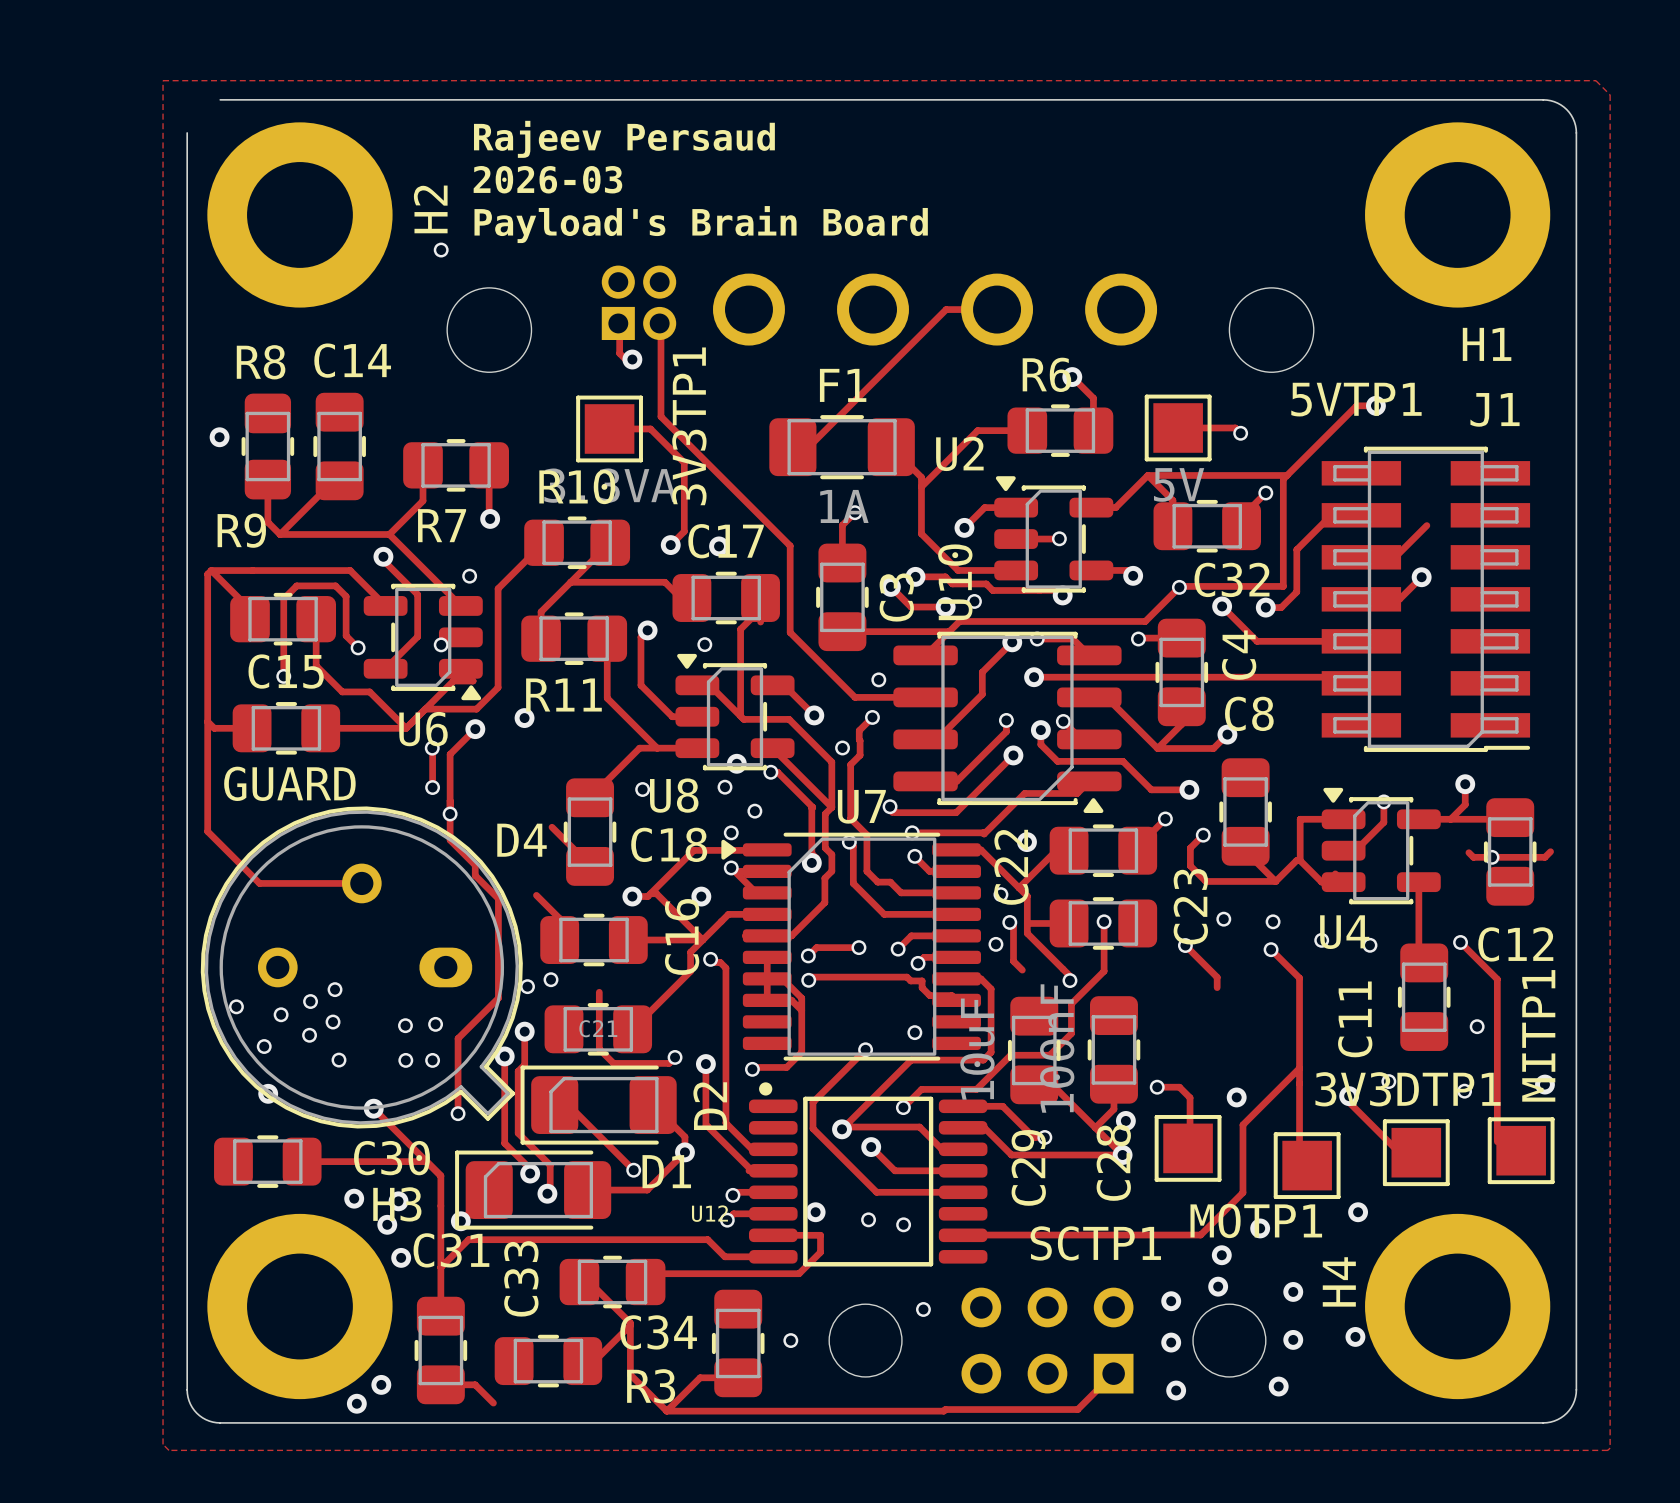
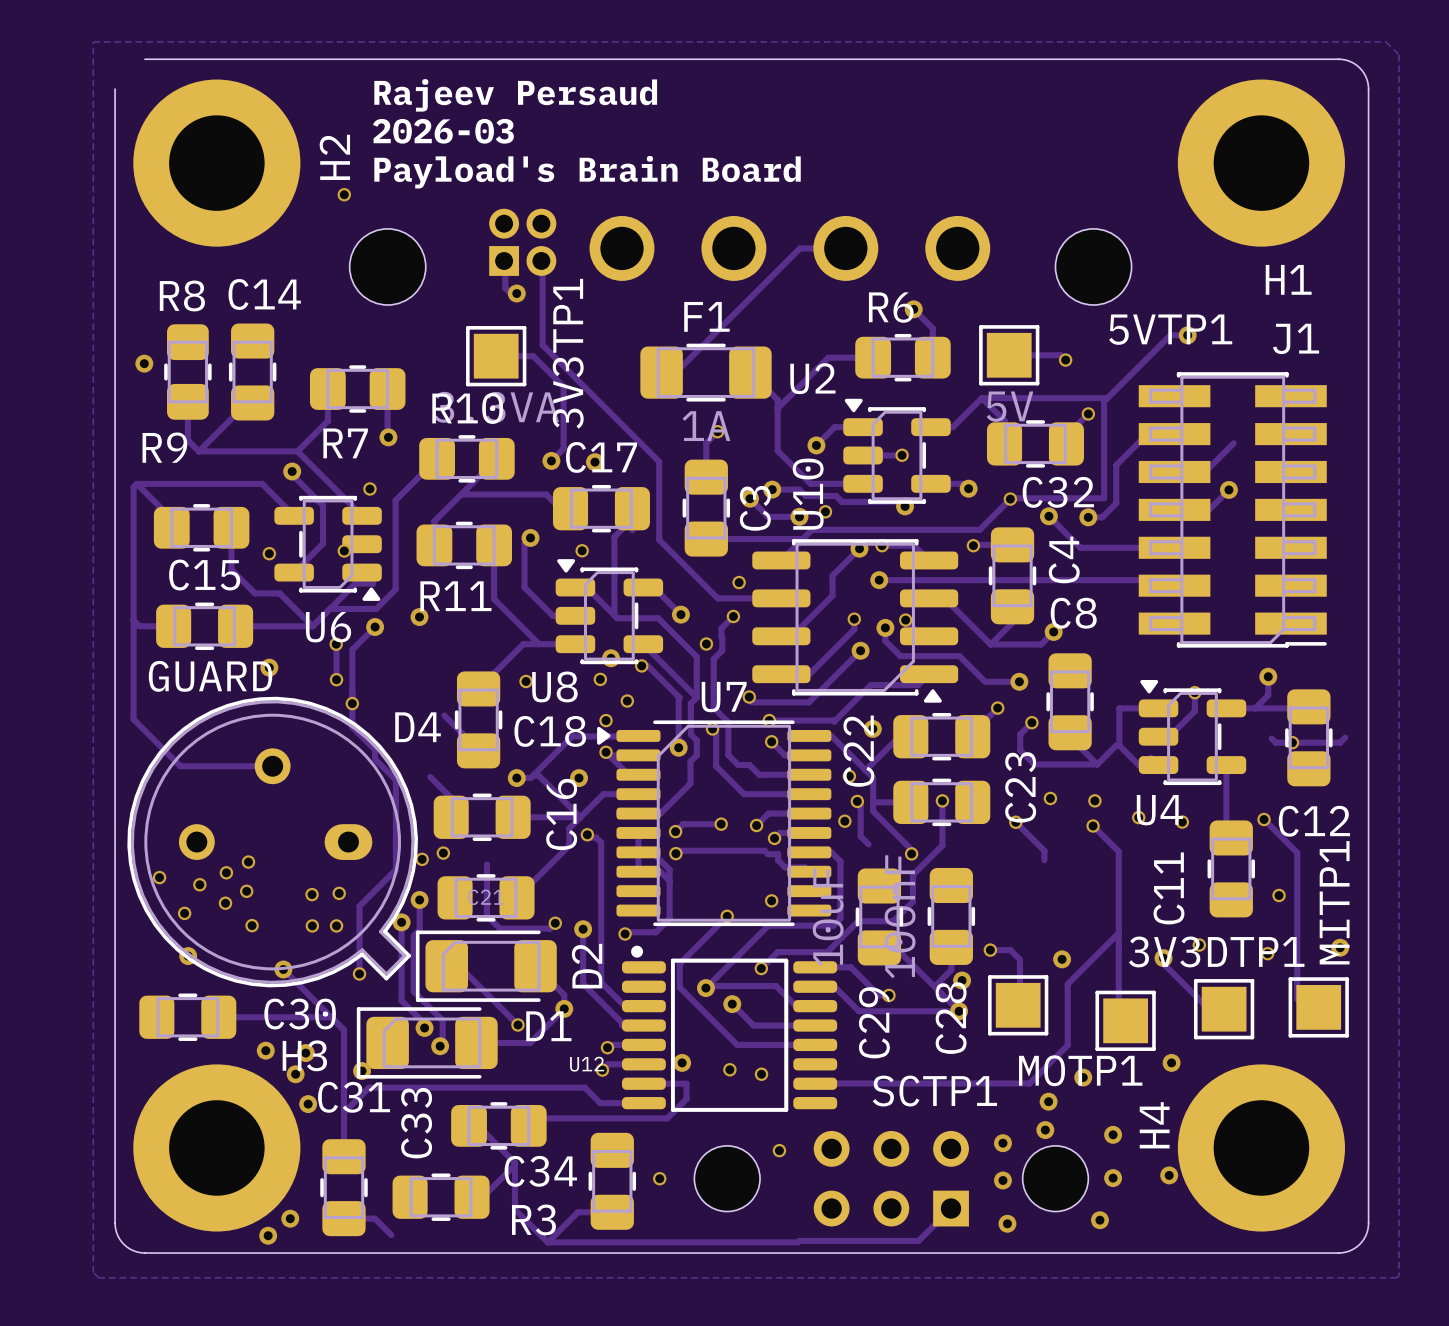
track: (358, 647) (346, 635) (346, 596) (335, 585) (296, 585) (283, 598) (283, 676) -> none
via: (283, 676) -> none
via: none -> (269, 667)

